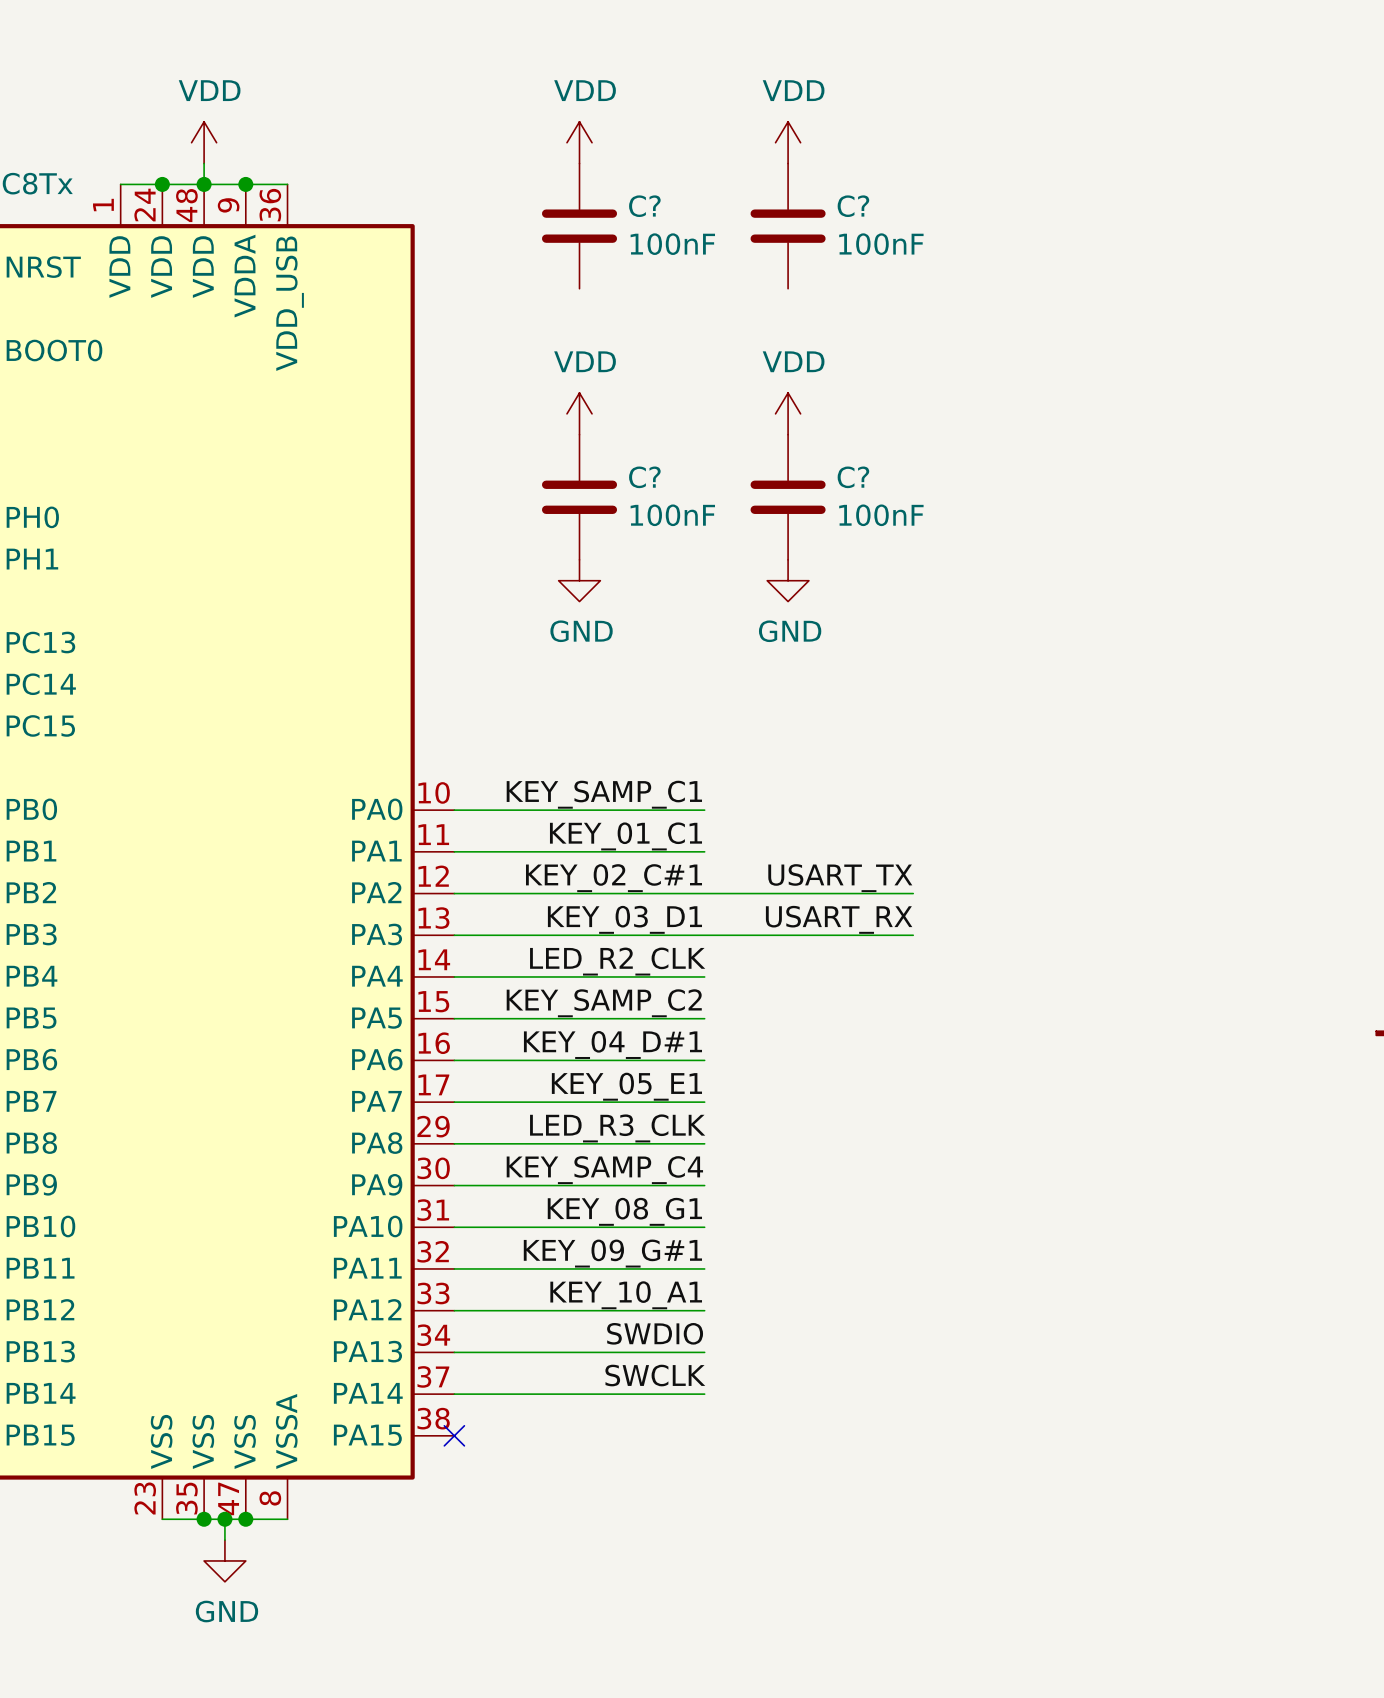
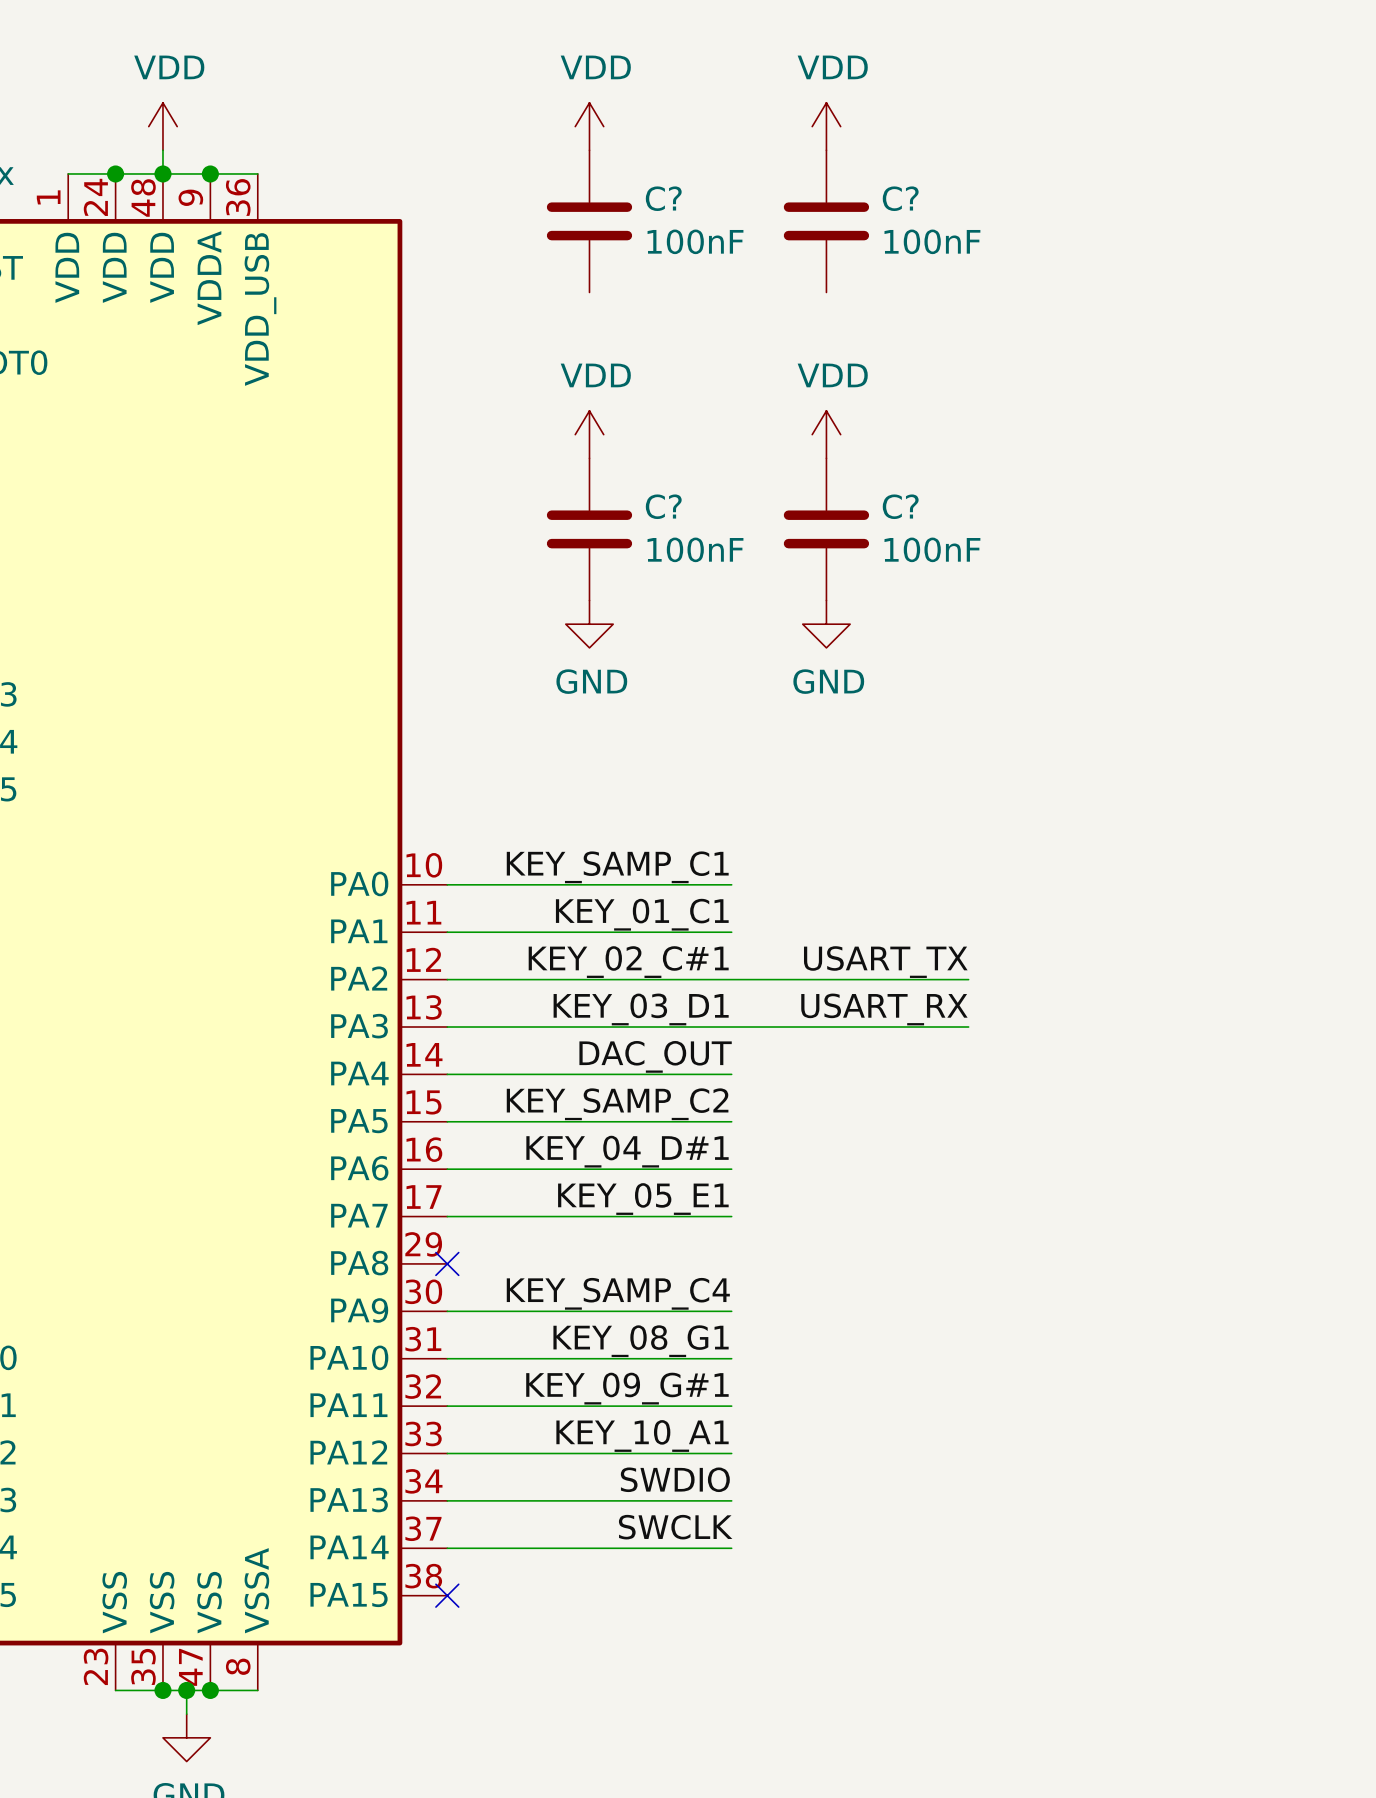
label: LED_R2_CLK (617, 961) -> DAC_OUT (655, 1056)
label: LED_R3_CLK (617, 1128) -> none
wire: (454, 1143) (704, 1143) -> none
no-connect mark: none -> (447, 1263)

